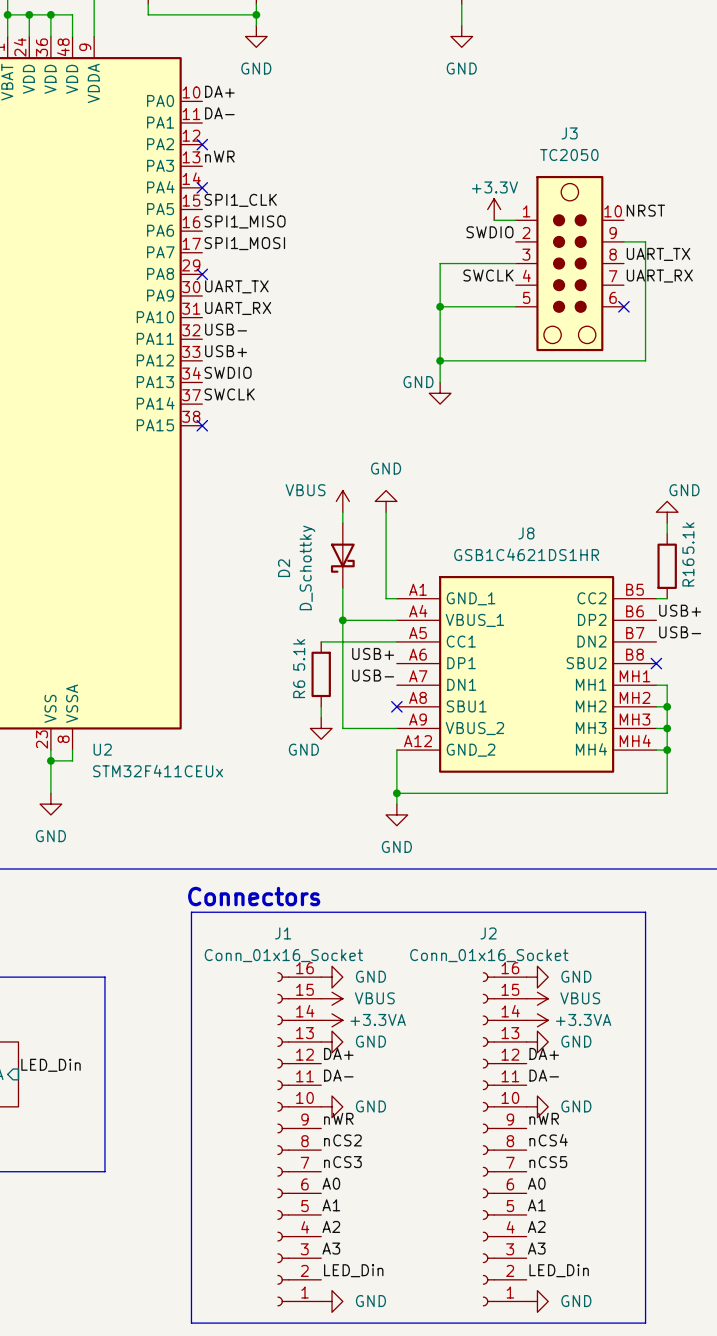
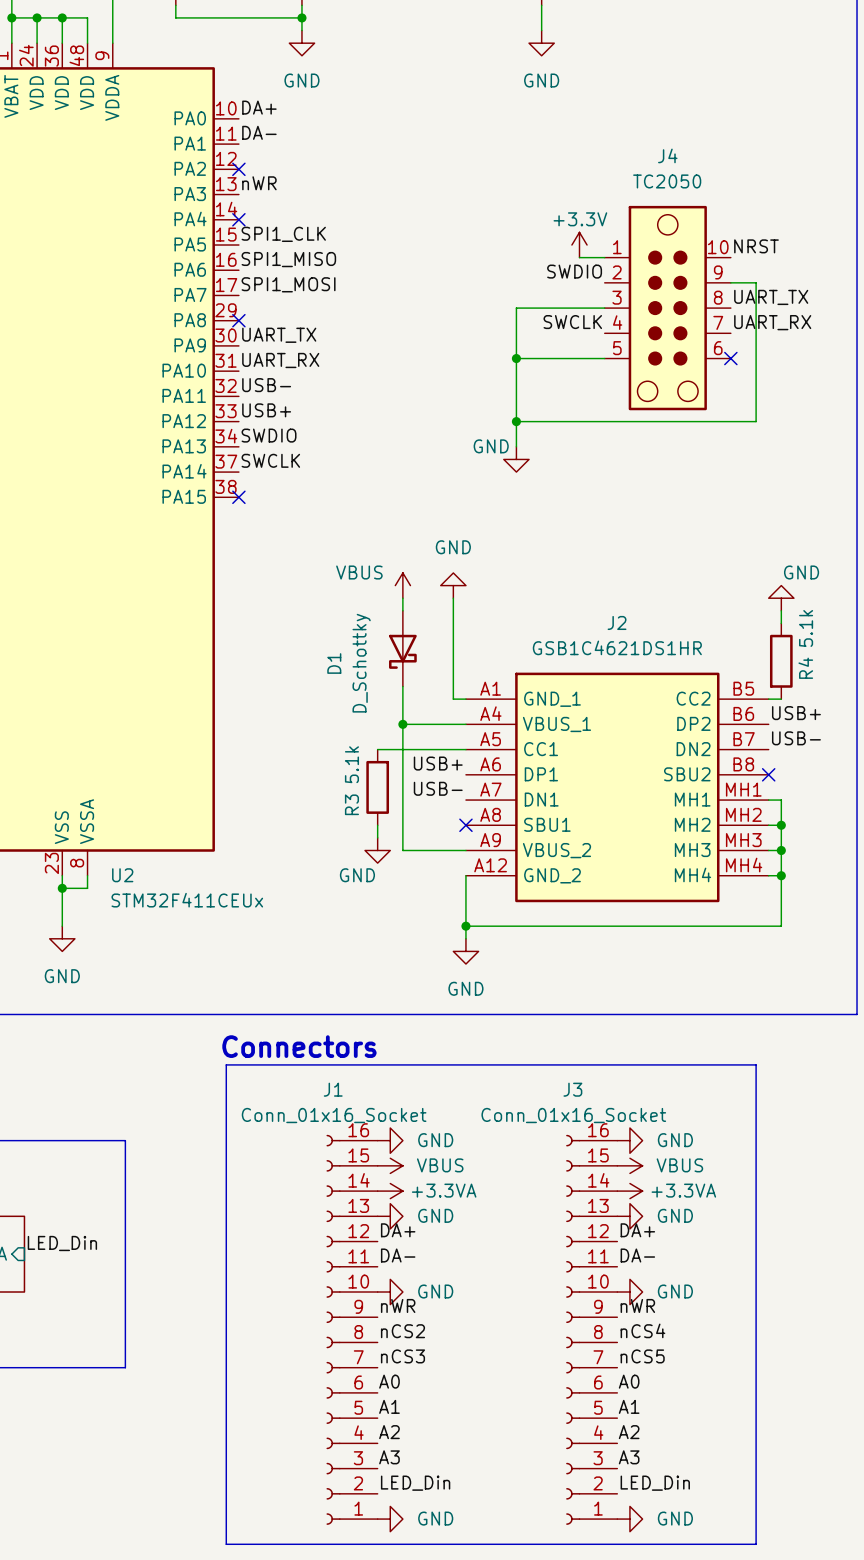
J3 name: J3 (569, 133) -> J4 (667, 155)
J8 name: J8 (526, 533) -> J2 (617, 622)
D2 name: D2 (284, 568) -> D1 (334, 663)
R16 name: R16 (688, 572) -> R4 (805, 668)
R6 name: R6 (299, 689) -> R3 (351, 804)
J2 name: J2 (488, 933) -> J3 (572, 1089)

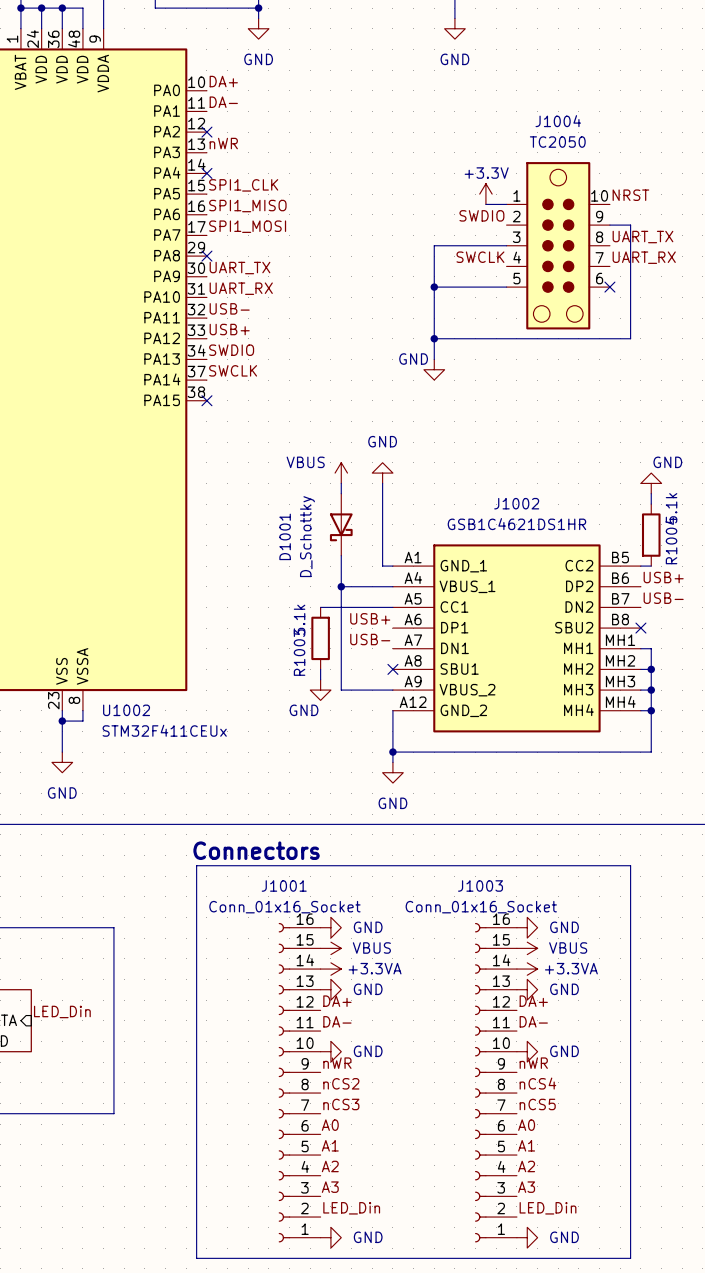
J4 name: J4 (667, 155) -> J1004 (558, 121)
J2 name: J2 (617, 622) -> J1002 (516, 503)
D1 name: D1 (334, 663) -> D1001 (285, 536)
R4 name: R4 (805, 668) -> R1004 (671, 540)
R3 name: R3 (351, 804) -> R1003 (299, 652)
U2 name: U2 (122, 875) -> U1002 (126, 710)
J1 name: J1 (333, 1089) -> J1001 (284, 885)
J3 name: J3 (572, 1089) -> J1003 (480, 885)

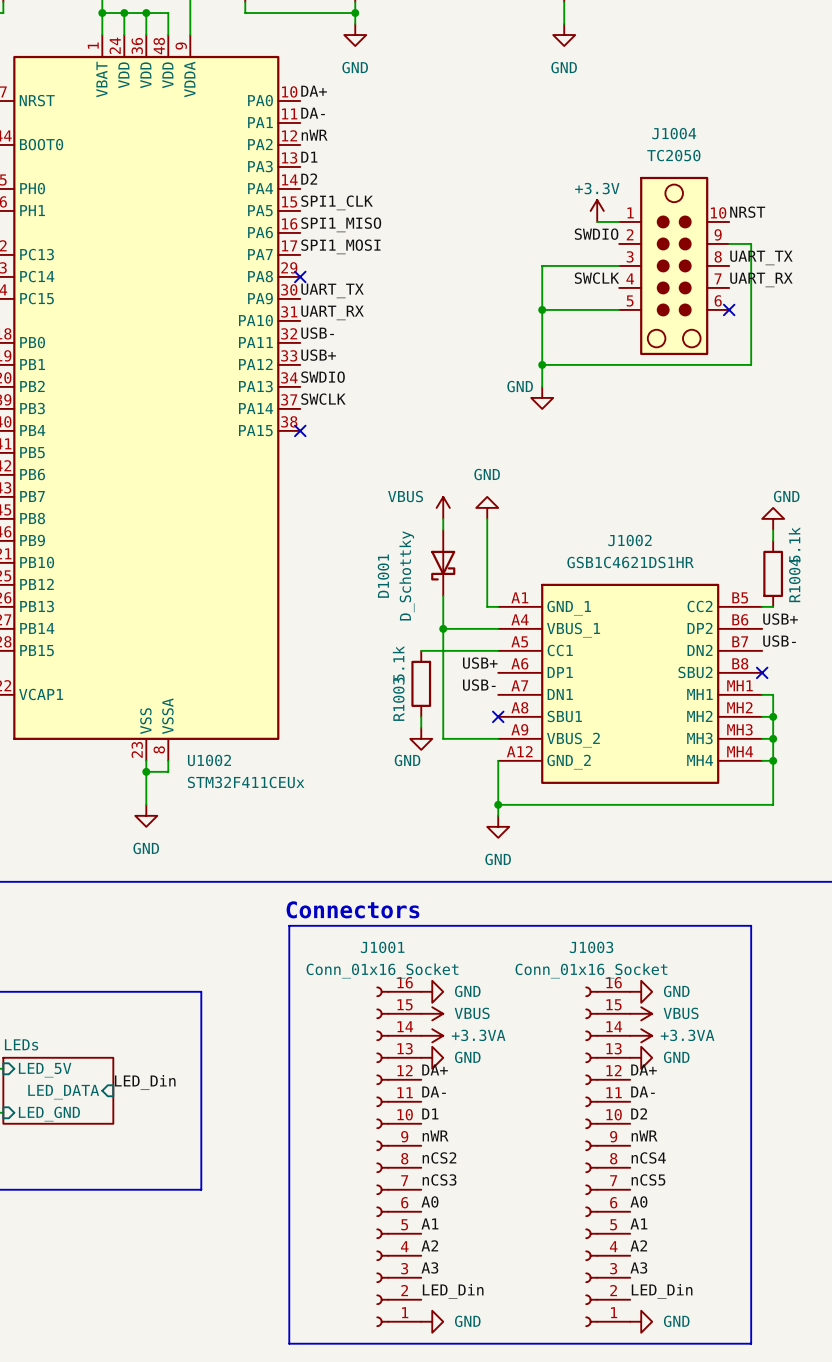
label: none -> nWR (314, 135)
no-connect mark: (206, 132) -> none
label: nWR (223, 143) -> D1 (309, 157)
label: none -> D2 (309, 179)
no-connect mark: (206, 173) -> none
label: none -> D1 (430, 1113)
label: none -> D2 (639, 1113)
power symbol: GND (330, 1051) -> none
power symbol: GND (527, 1051) -> none

